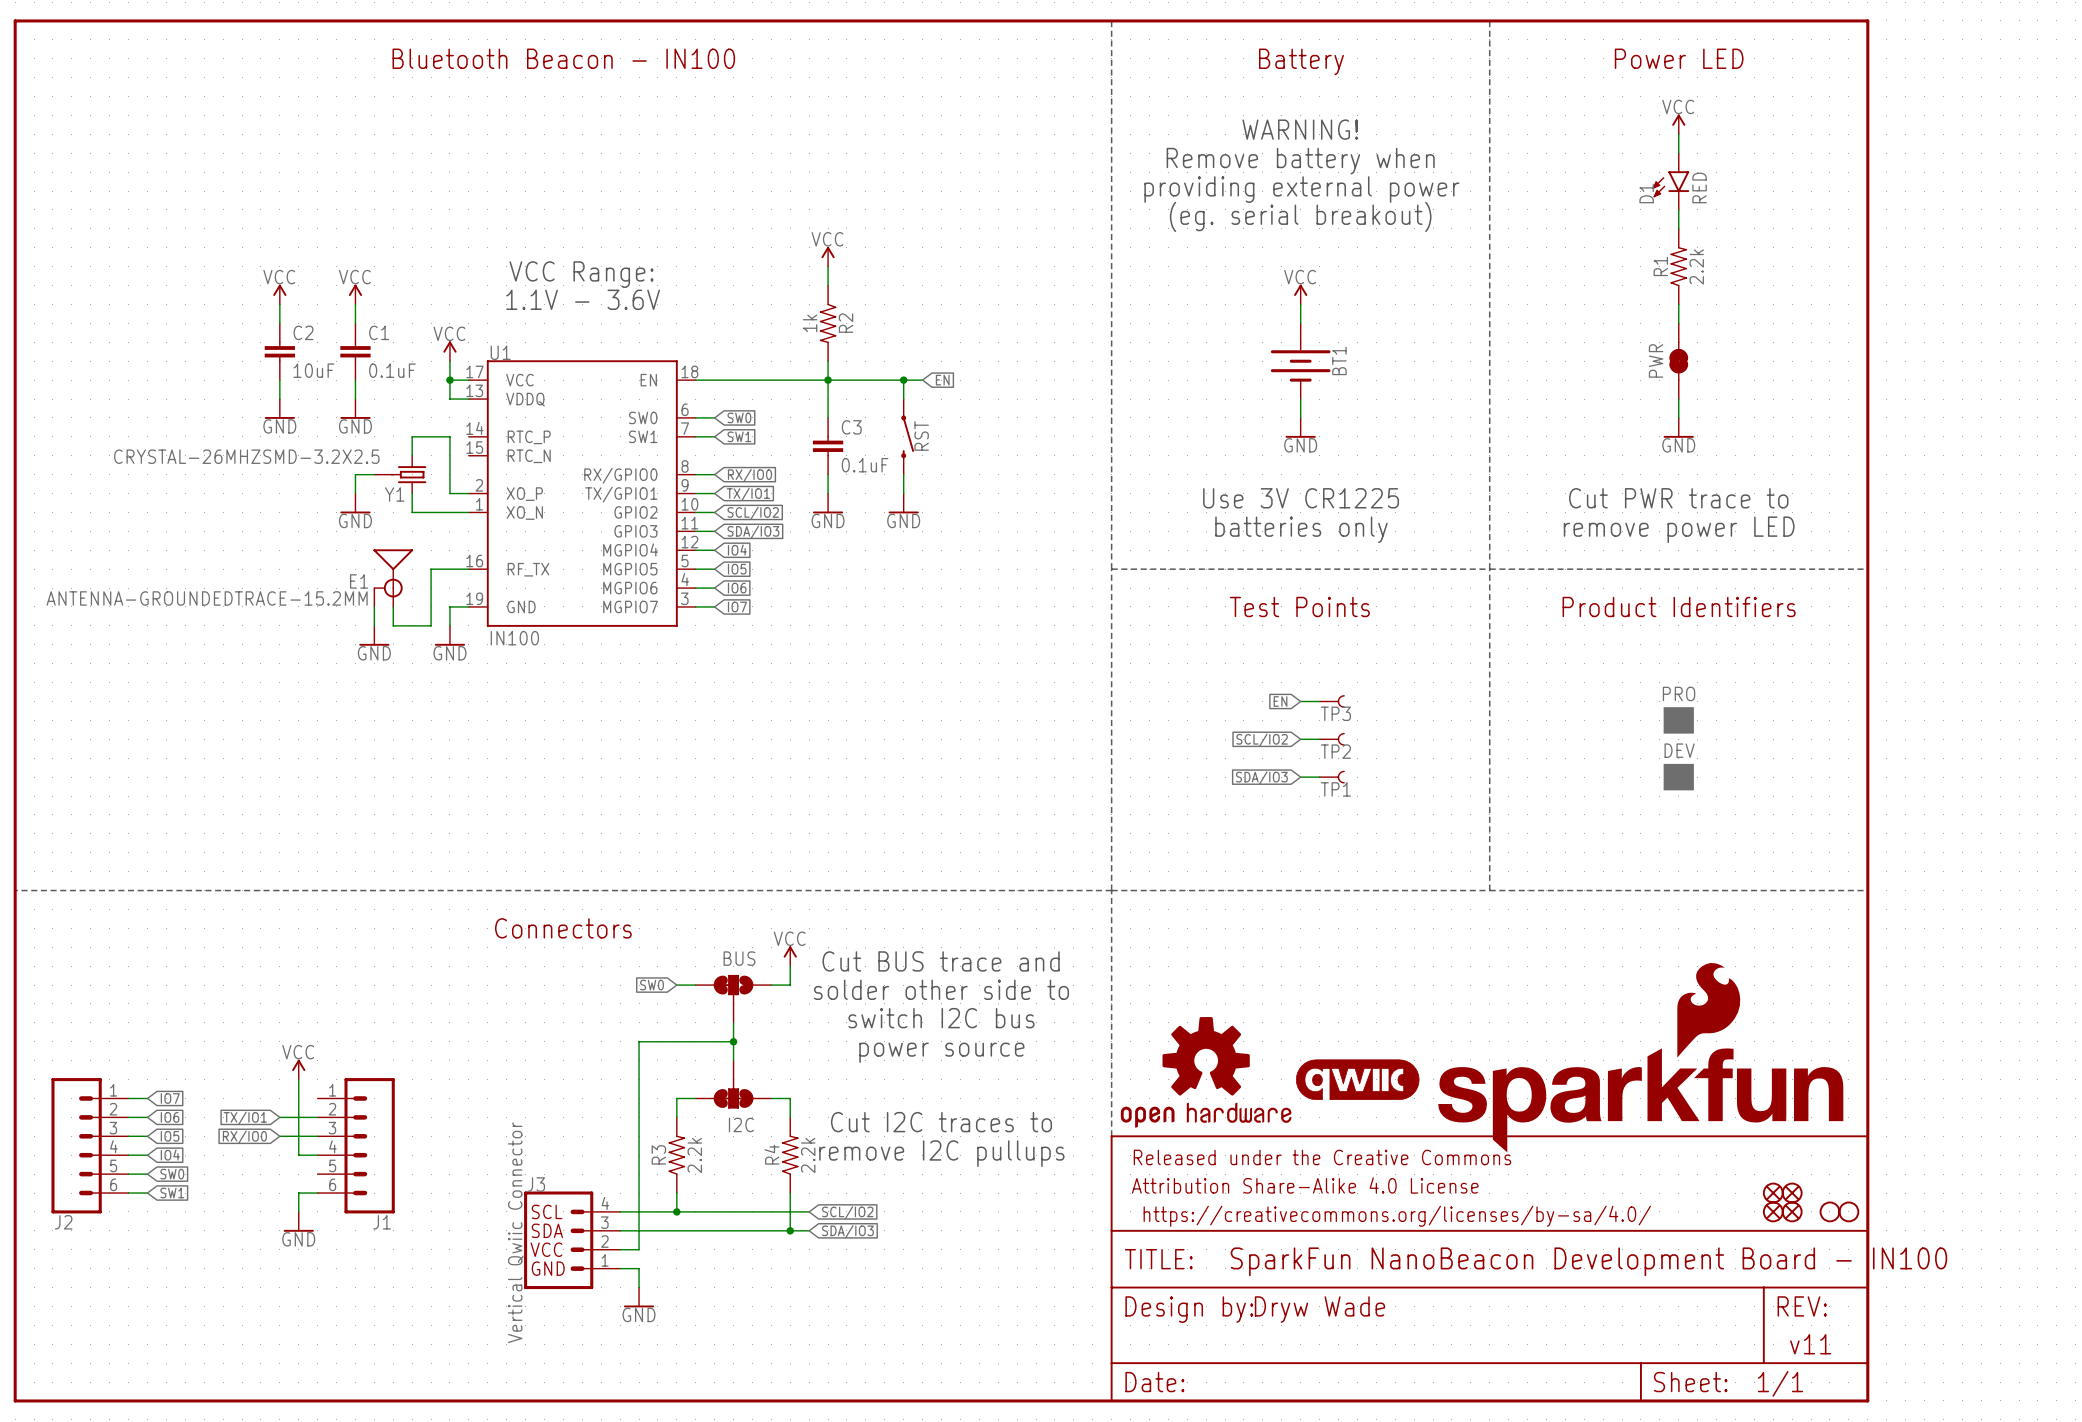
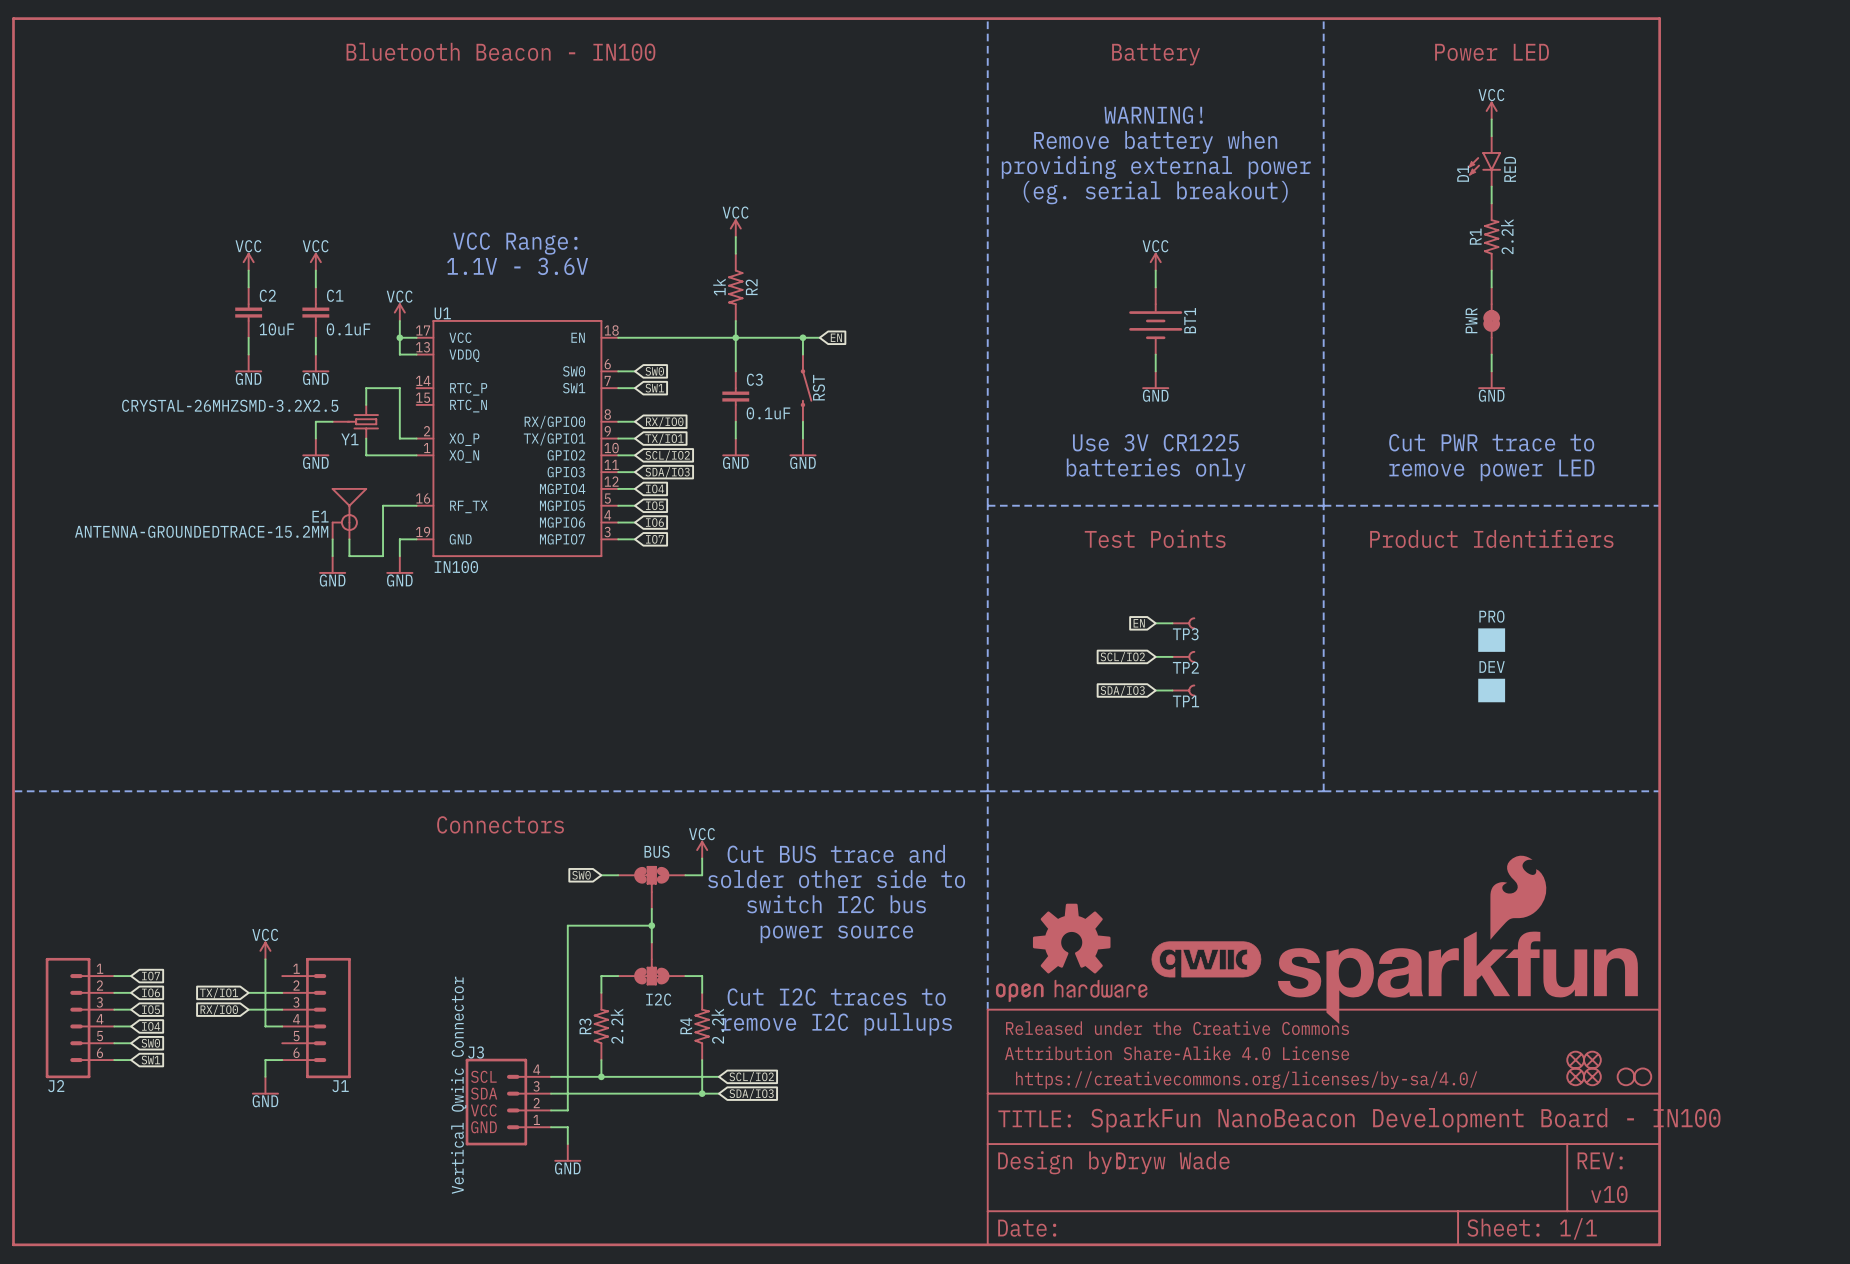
text: v11 (1810, 1344) -> v10 (1609, 1194)

